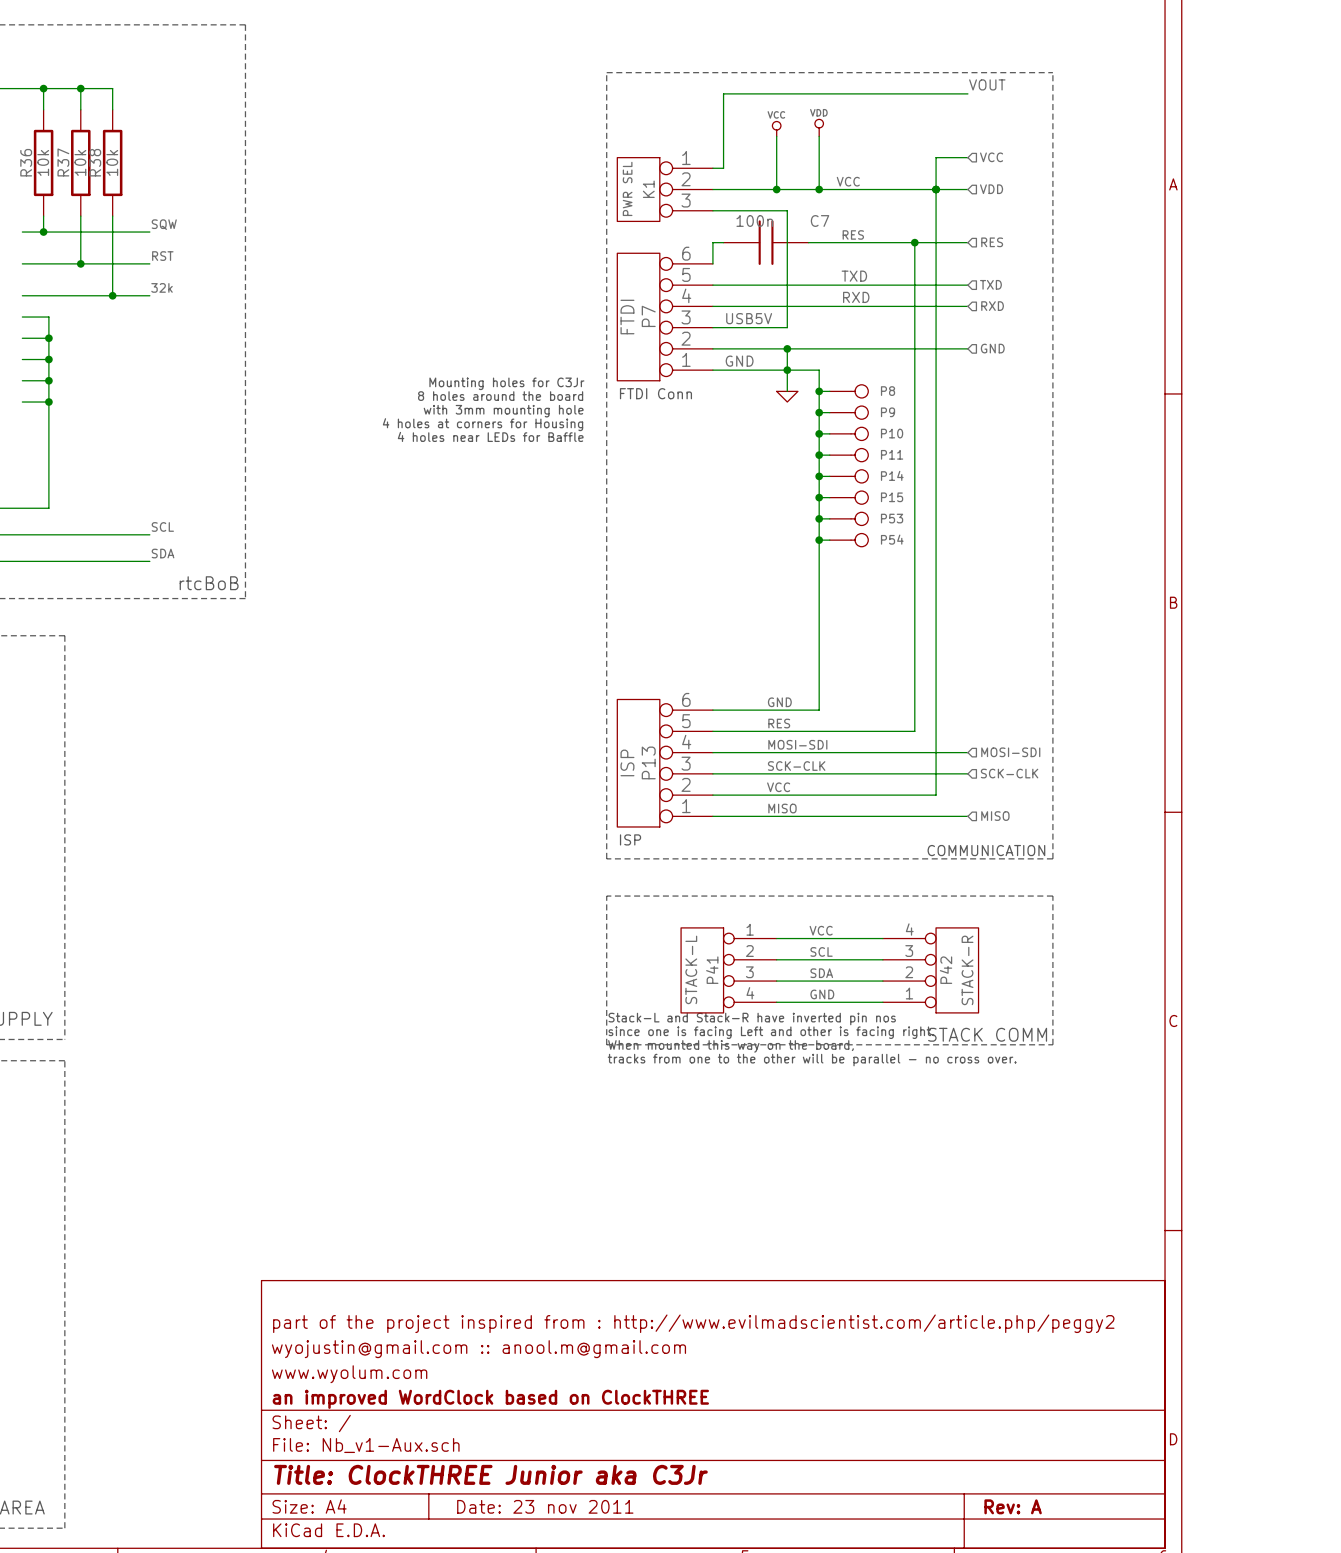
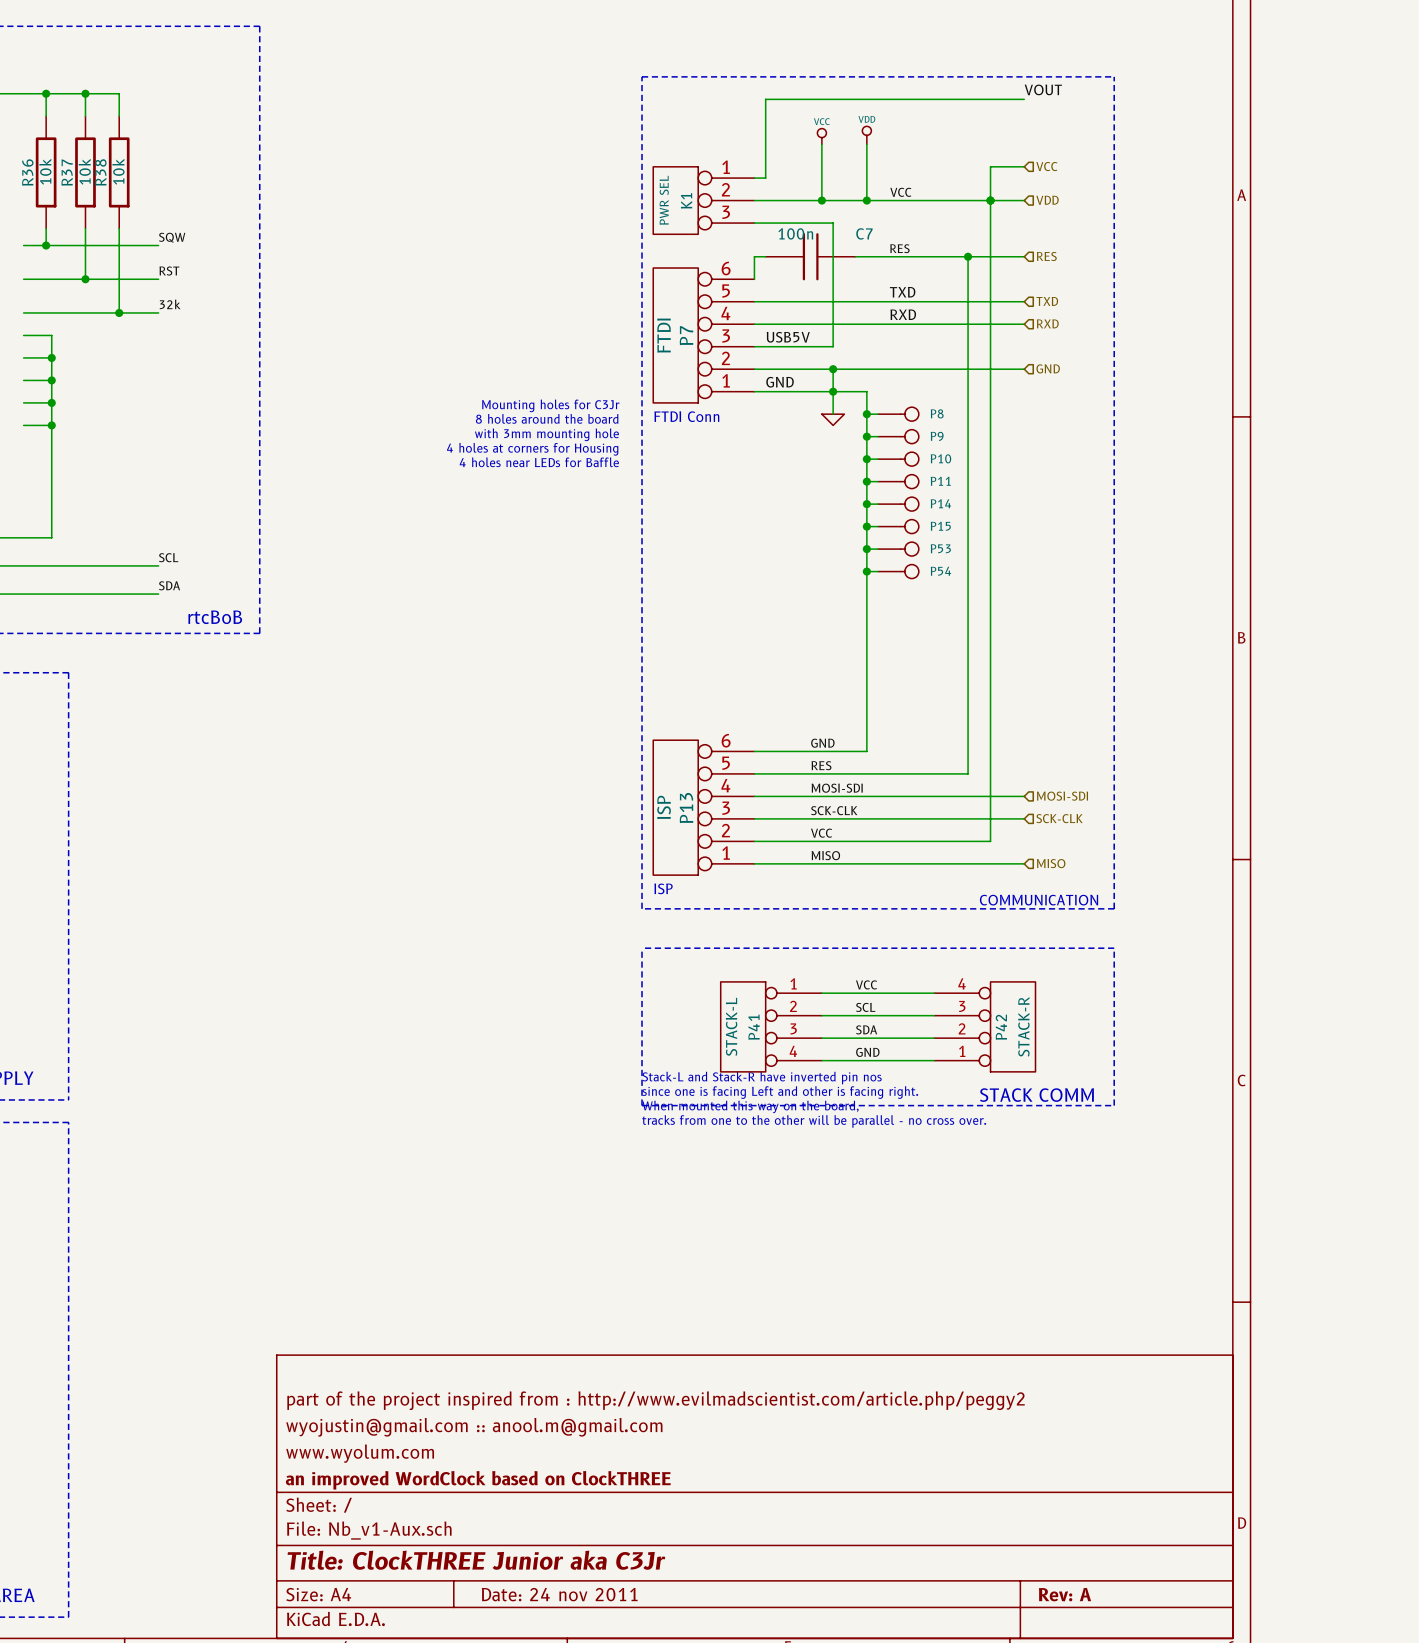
title block: Date: 23 nov 2011 (545, 1506) -> Date: 24 nov 2011 (559, 1594)

